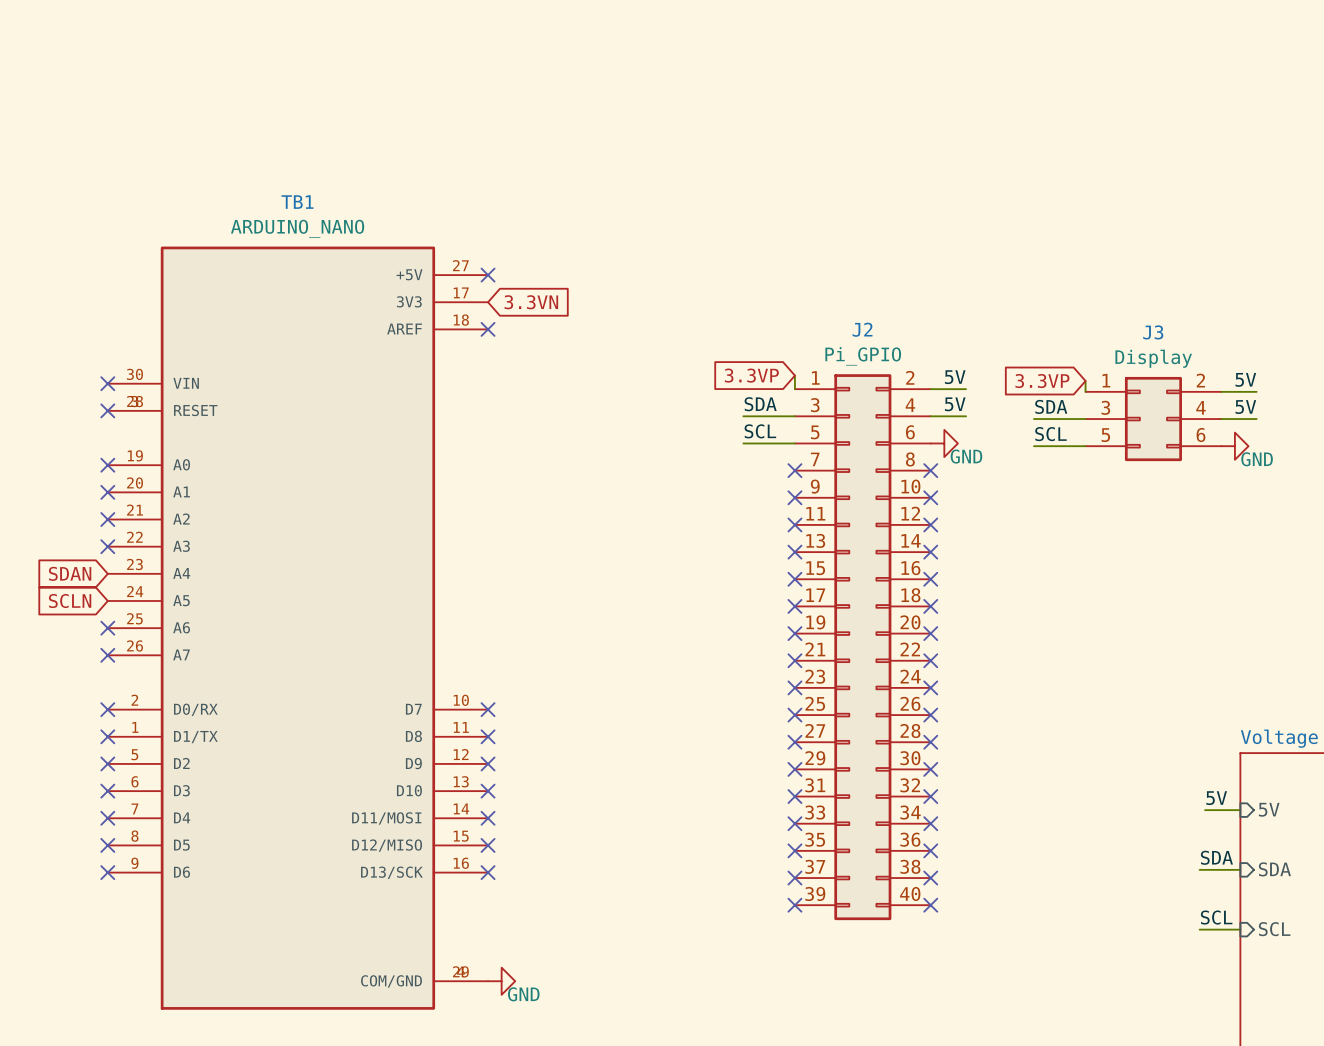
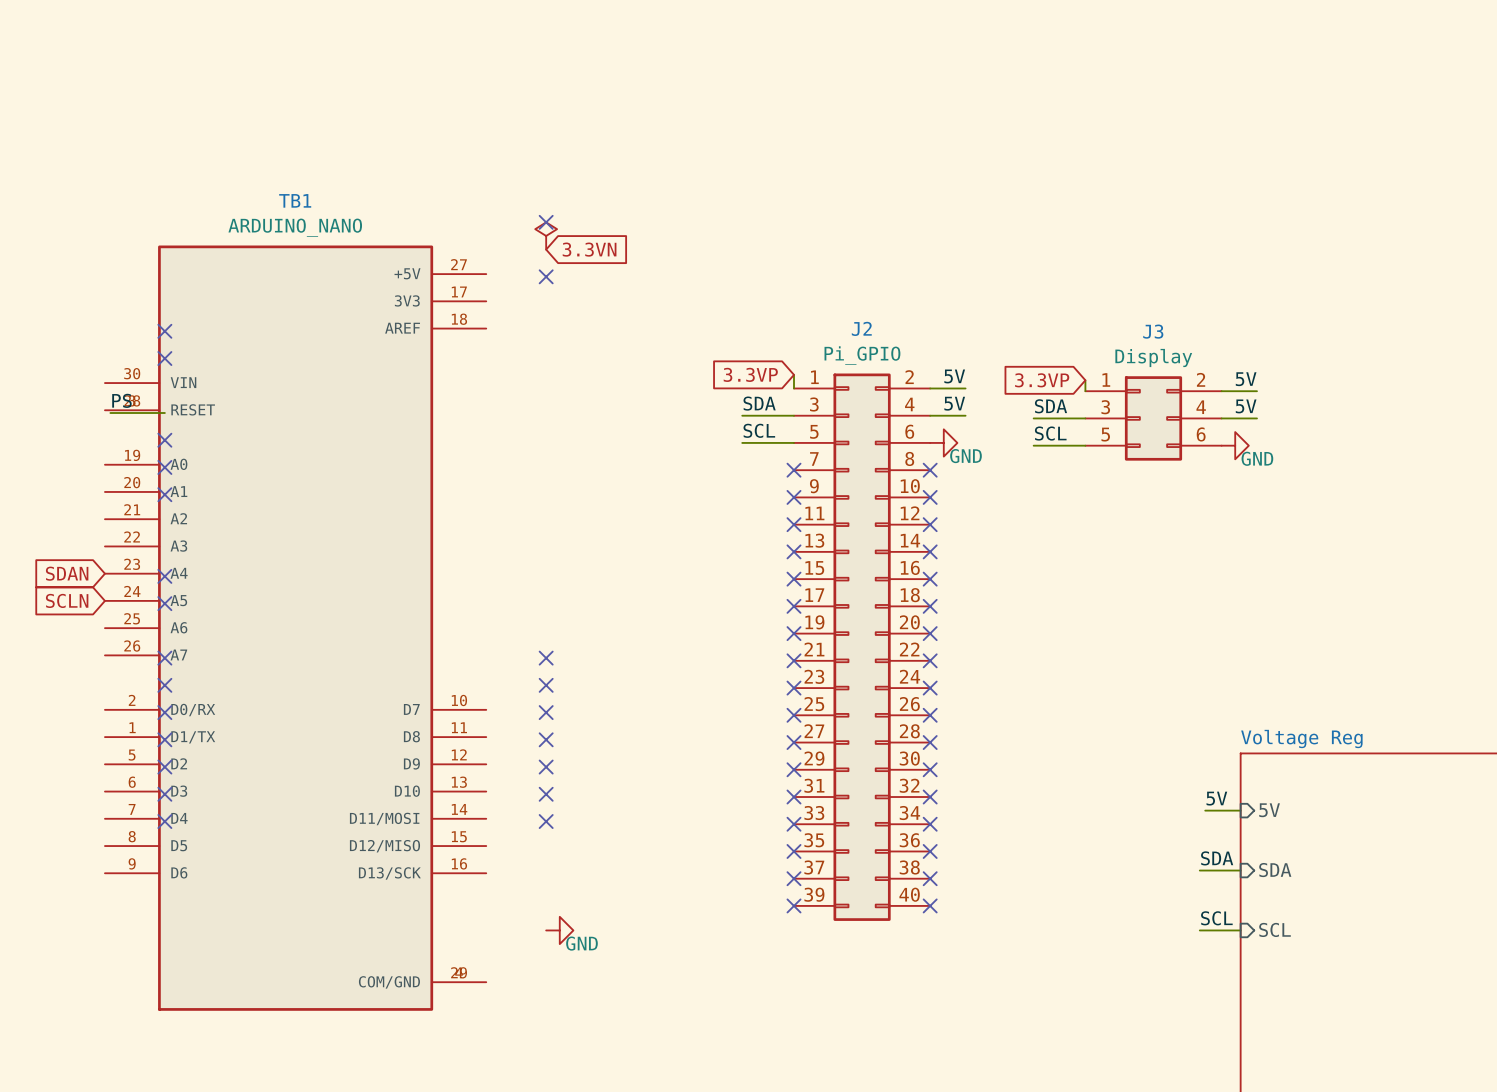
no-connect mark: none -> (546, 222)
power symbol: none -> (546, 235)
no-connect mark: (488, 275) -> none
no-connect mark: none -> (546, 276)
global label position: 3.3VN (531, 302) -> 3.3VN (589, 249)
no-connect mark: (488, 329) -> none
no-connect mark: none -> (164, 331)
no-connect mark: none -> (164, 358)
no-connect mark: (107, 383) -> none
label: none -> PS (121, 400)
no-connect mark: (107, 410) -> none
wire: none -> (110, 412) (164, 412)
no-connect mark: none -> (164, 440)
no-connect mark: (107, 465) -> none
no-connect mark: none -> (164, 467)
no-connect mark: (107, 492) -> none
no-connect mark: none -> (164, 494)
no-connect mark: (107, 519) -> none
no-connect mark: (107, 546) -> none
no-connect mark: none -> (164, 576)
no-connect mark: none -> (164, 603)
no-connect mark: (107, 628) -> none
no-connect mark: (107, 655) -> none
no-connect mark: none -> (164, 658)
no-connect mark: none -> (546, 658)
no-connect mark: none -> (164, 685)
no-connect mark: none -> (546, 685)
no-connect mark: (107, 709) -> none
no-connect mark: (488, 709) -> none
no-connect mark: none -> (164, 712)
no-connect mark: none -> (546, 712)
no-connect mark: (107, 736) -> none
no-connect mark: (488, 736) -> none
no-connect mark: none -> (164, 739)
no-connect mark: none -> (546, 739)
no-connect mark: (107, 763) -> none
no-connect mark: (488, 763) -> none
no-connect mark: none -> (164, 767)
no-connect mark: none -> (546, 767)
no-connect mark: (107, 791) -> none
no-connect mark: (488, 791) -> none
no-connect mark: none -> (164, 794)
no-connect mark: none -> (546, 794)
no-connect mark: (107, 818) -> none
no-connect mark: (488, 818) -> none
no-connect mark: none -> (164, 821)
no-connect mark: none -> (546, 821)
no-connect mark: (107, 845) -> none
no-connect mark: (488, 845) -> none
no-connect mark: (107, 872) -> none
no-connect mark: (488, 872) -> none
power symbol position: GND (501, 981) -> GND (559, 930)

